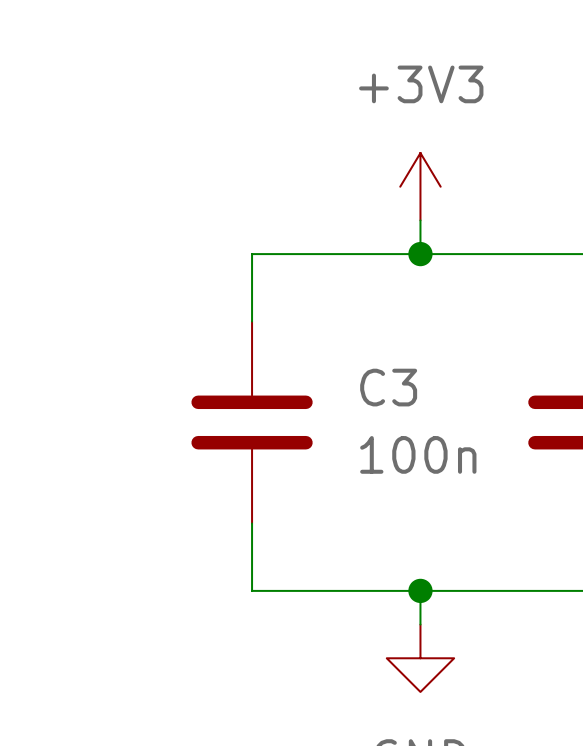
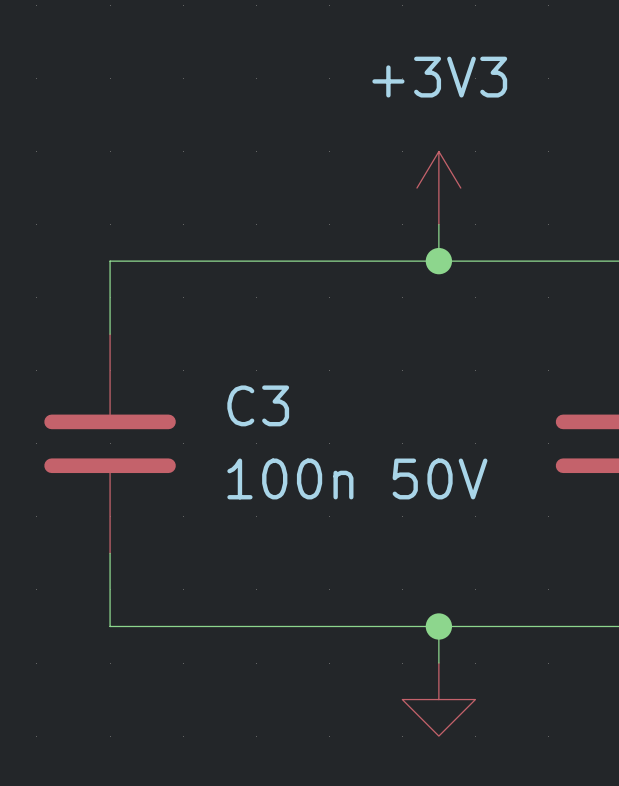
wire: (252, 254) (252, 321) -> (256, 261) (110, 261) (110, 334)
C3 position: (252, 422) -> (110, 443)
C3 value: 100n (418, 454) -> 100n 50V (357, 478)
wire: (252, 523) (252, 590) -> (110, 553) (110, 626) (256, 626)

